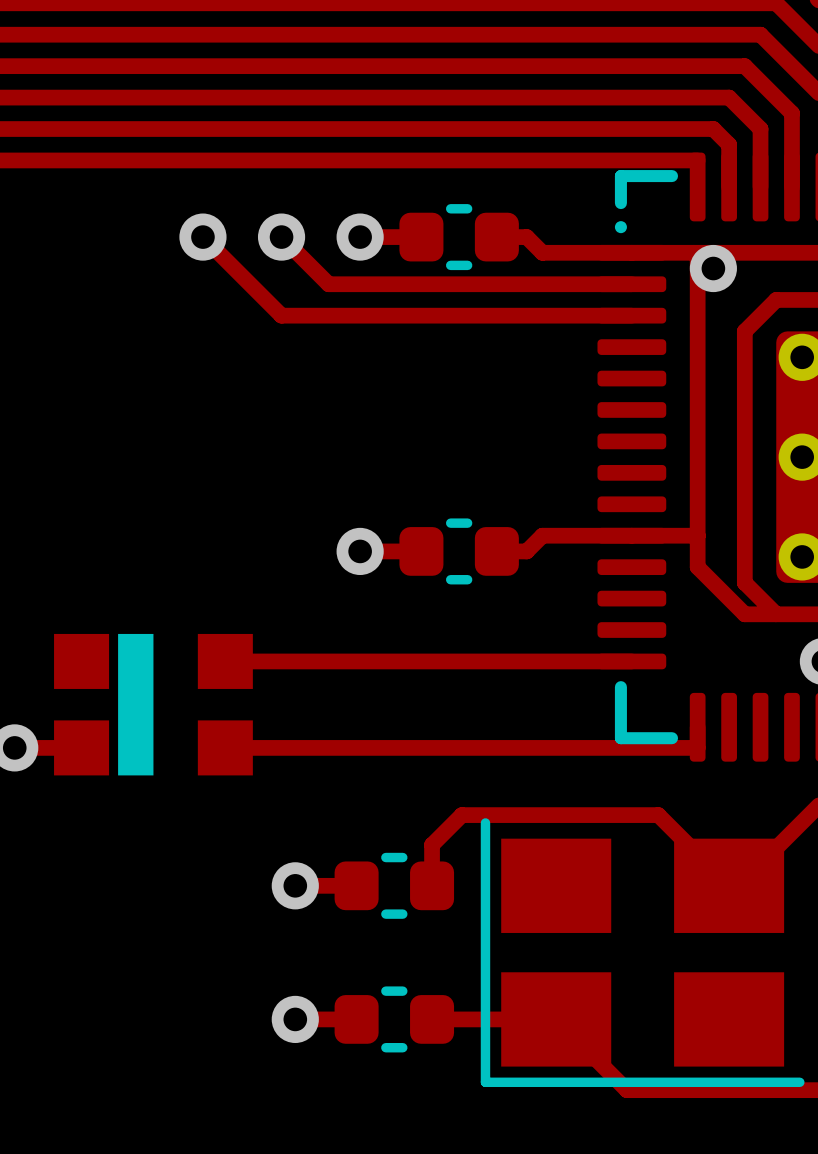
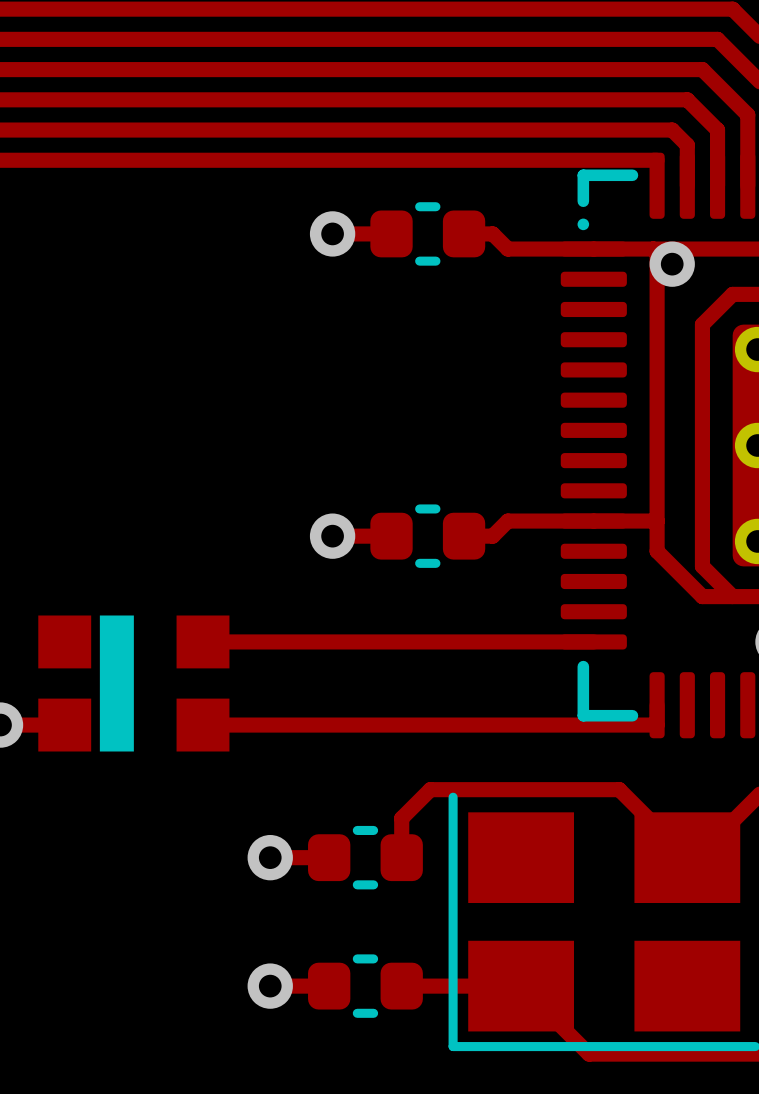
track: (202, 237) (281, 315) (631, 315) -> none
via: (202, 237) -> none
track: (281, 237) (328, 284) (631, 284) -> none
via: (281, 237) -> none

